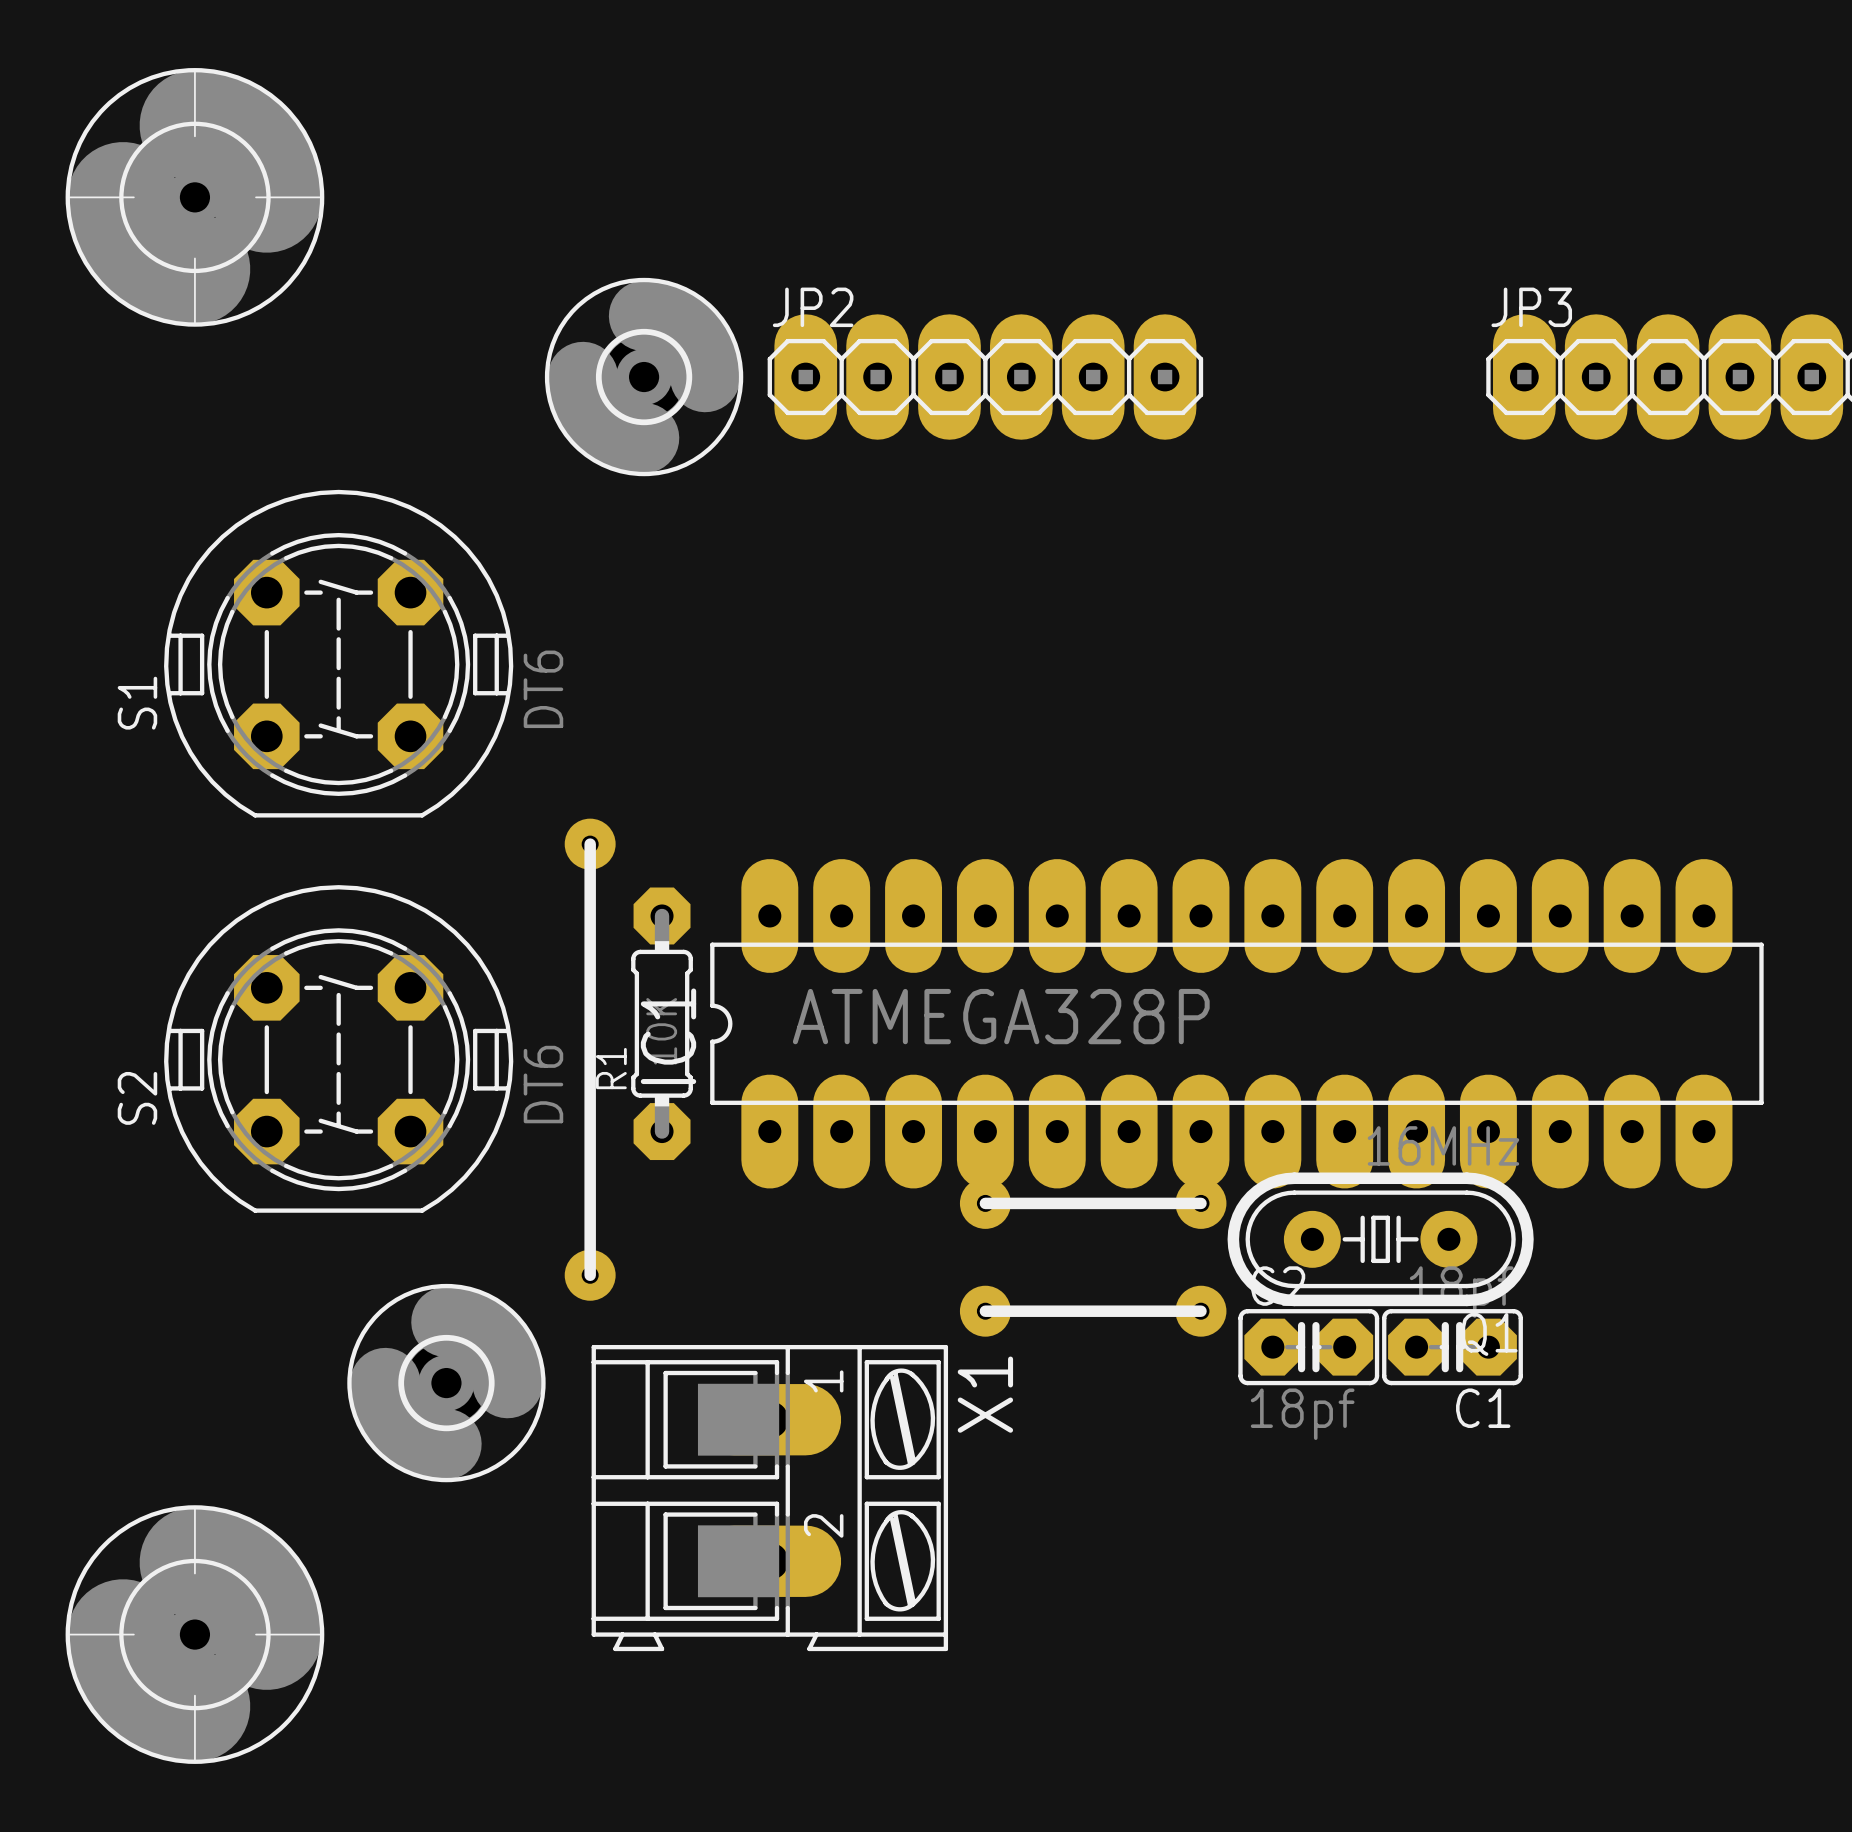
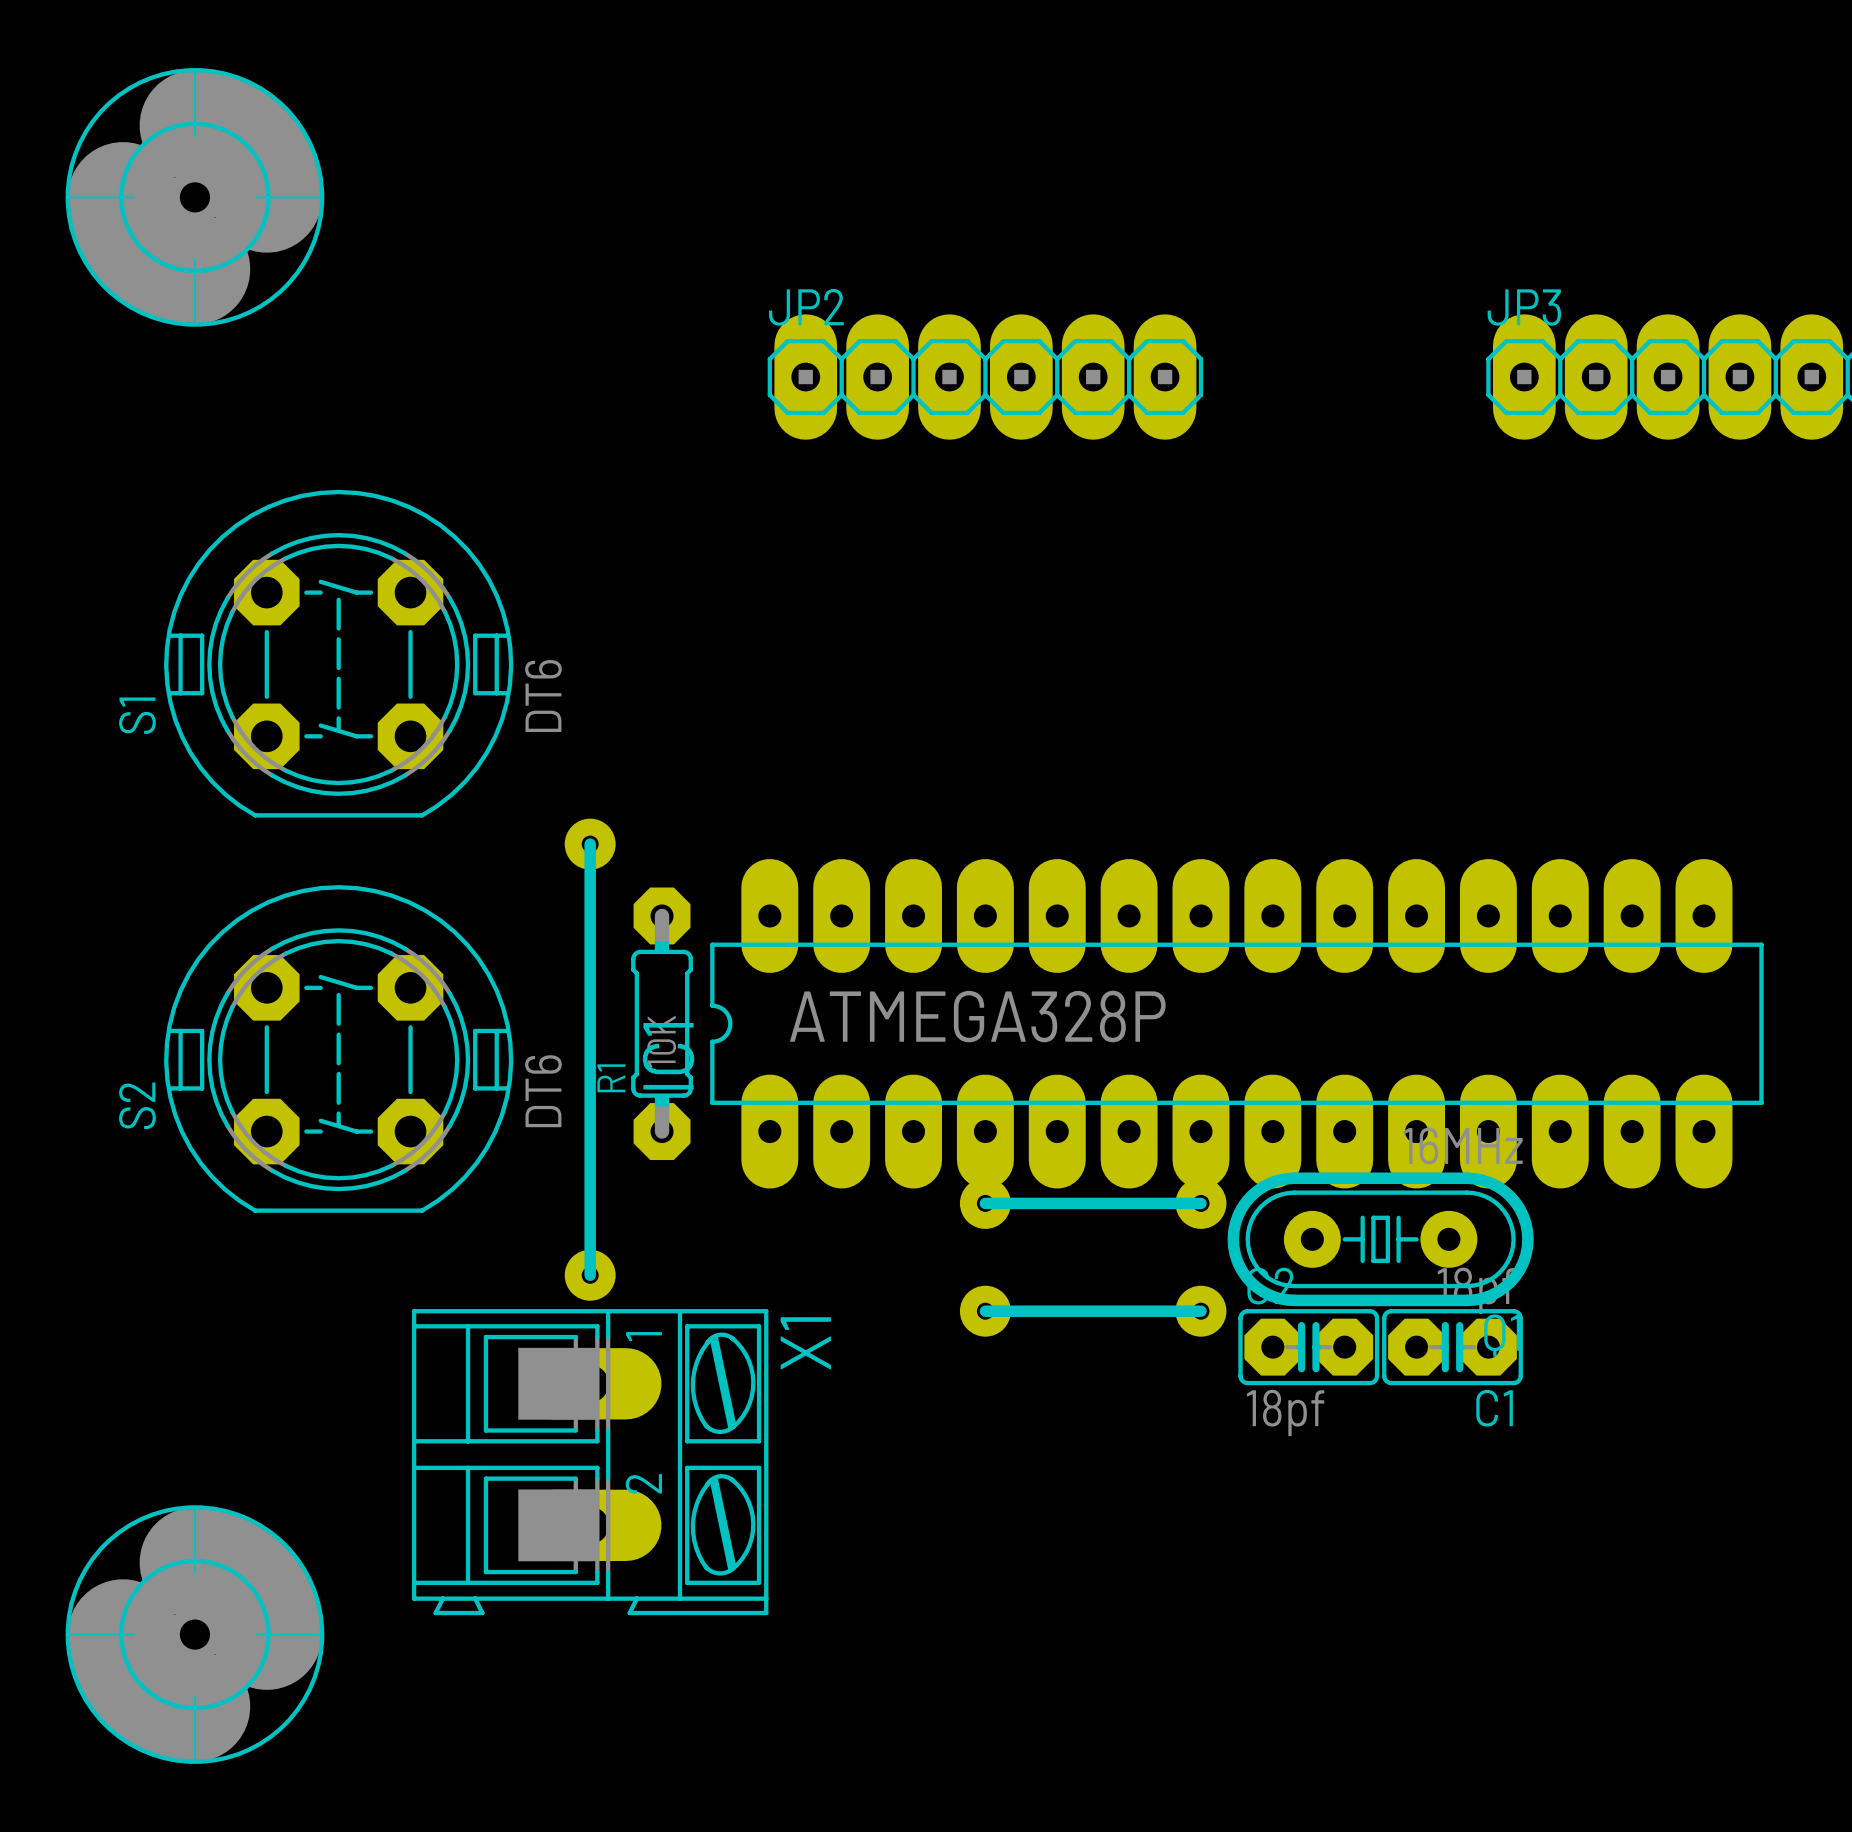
part: (644, 377) -> none
part: (446, 1383) -> none
X1 position: (769, 1498) -> (590, 1462)

